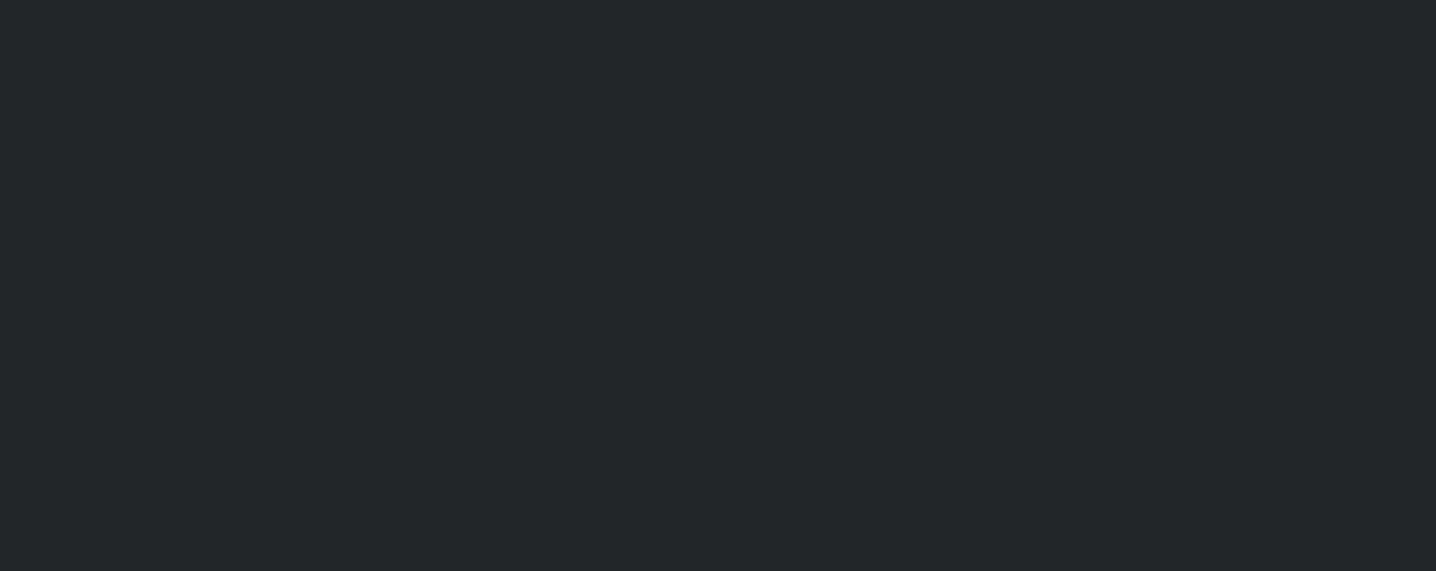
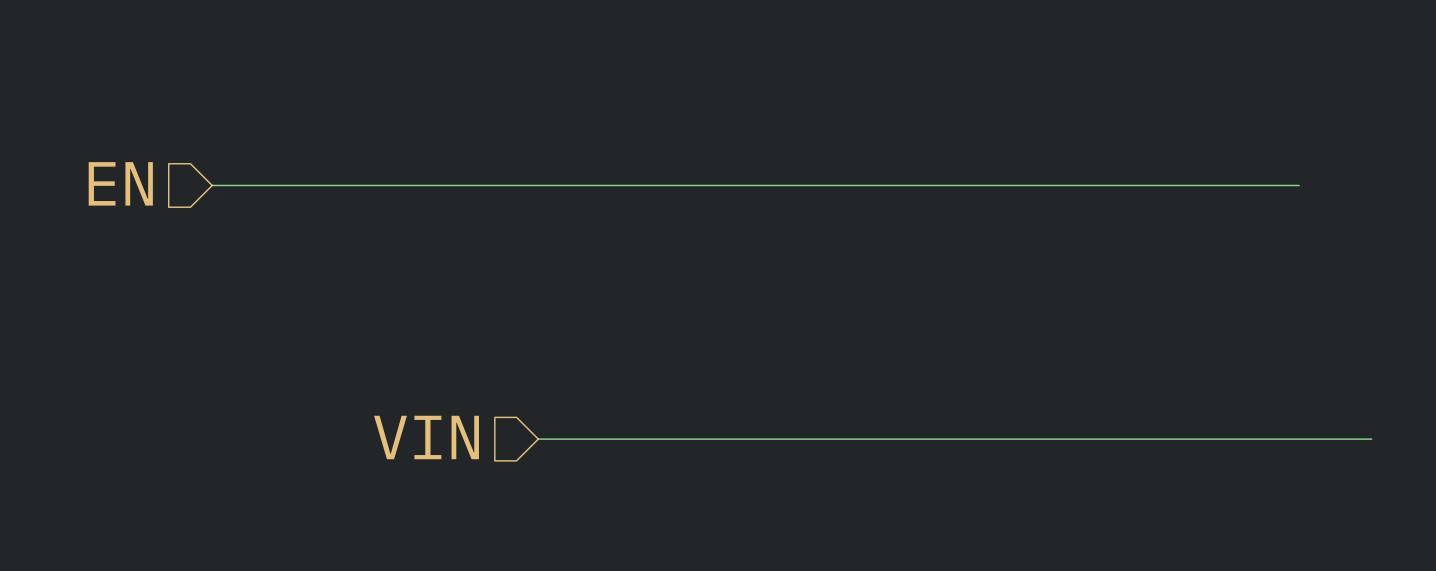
hierarchical label: none -> EN (120, 183)
wire: none -> (212, 185) (1299, 185)
hierarchical label: none -> VIN (426, 437)
wire: none -> (538, 439) (1371, 439)

